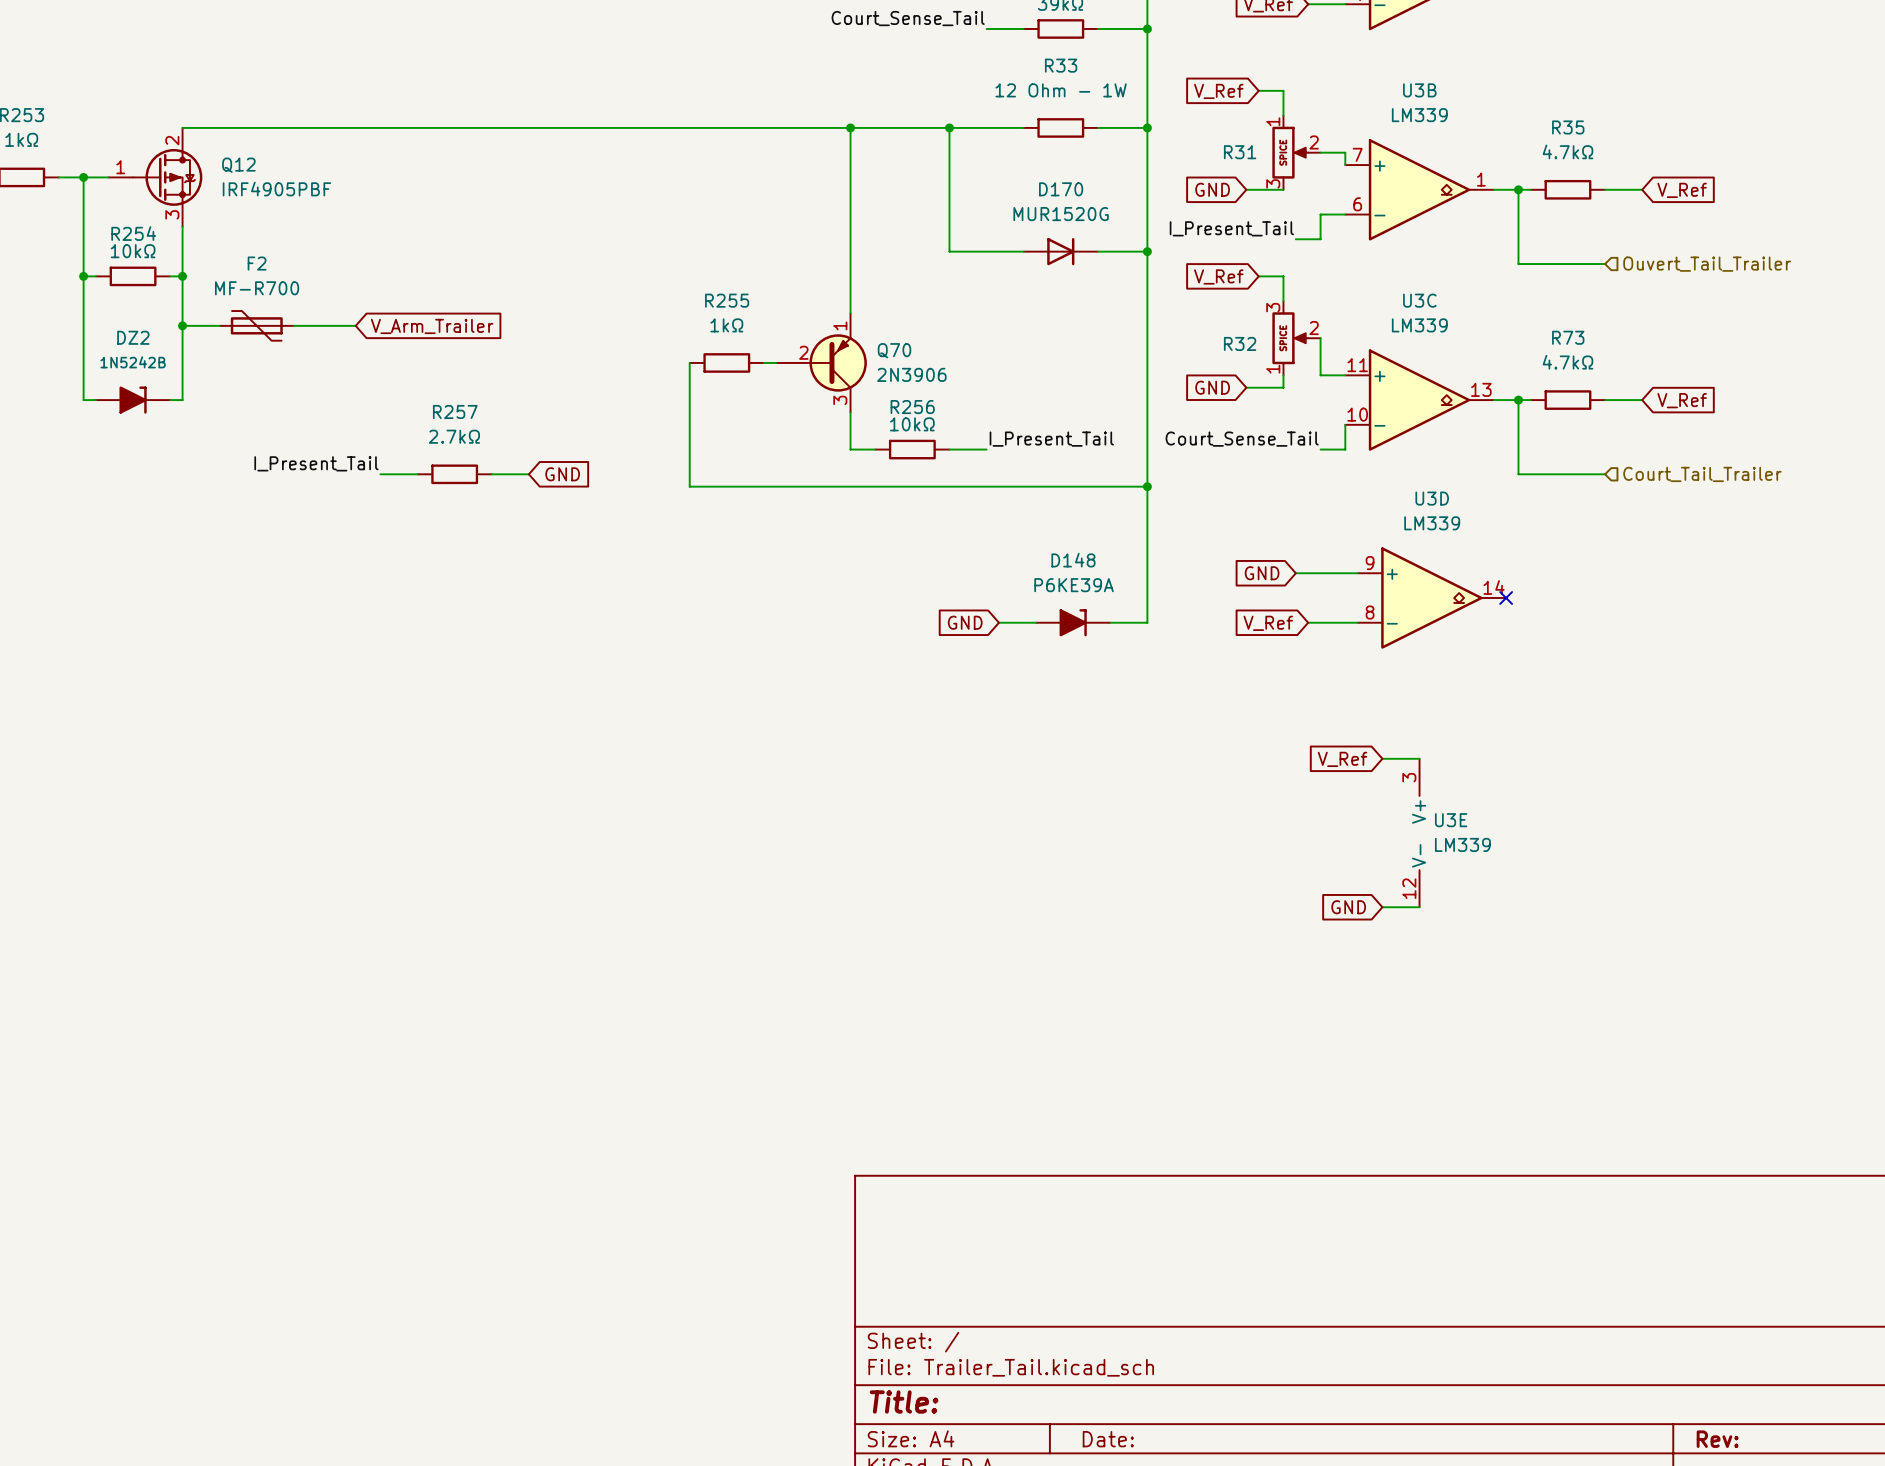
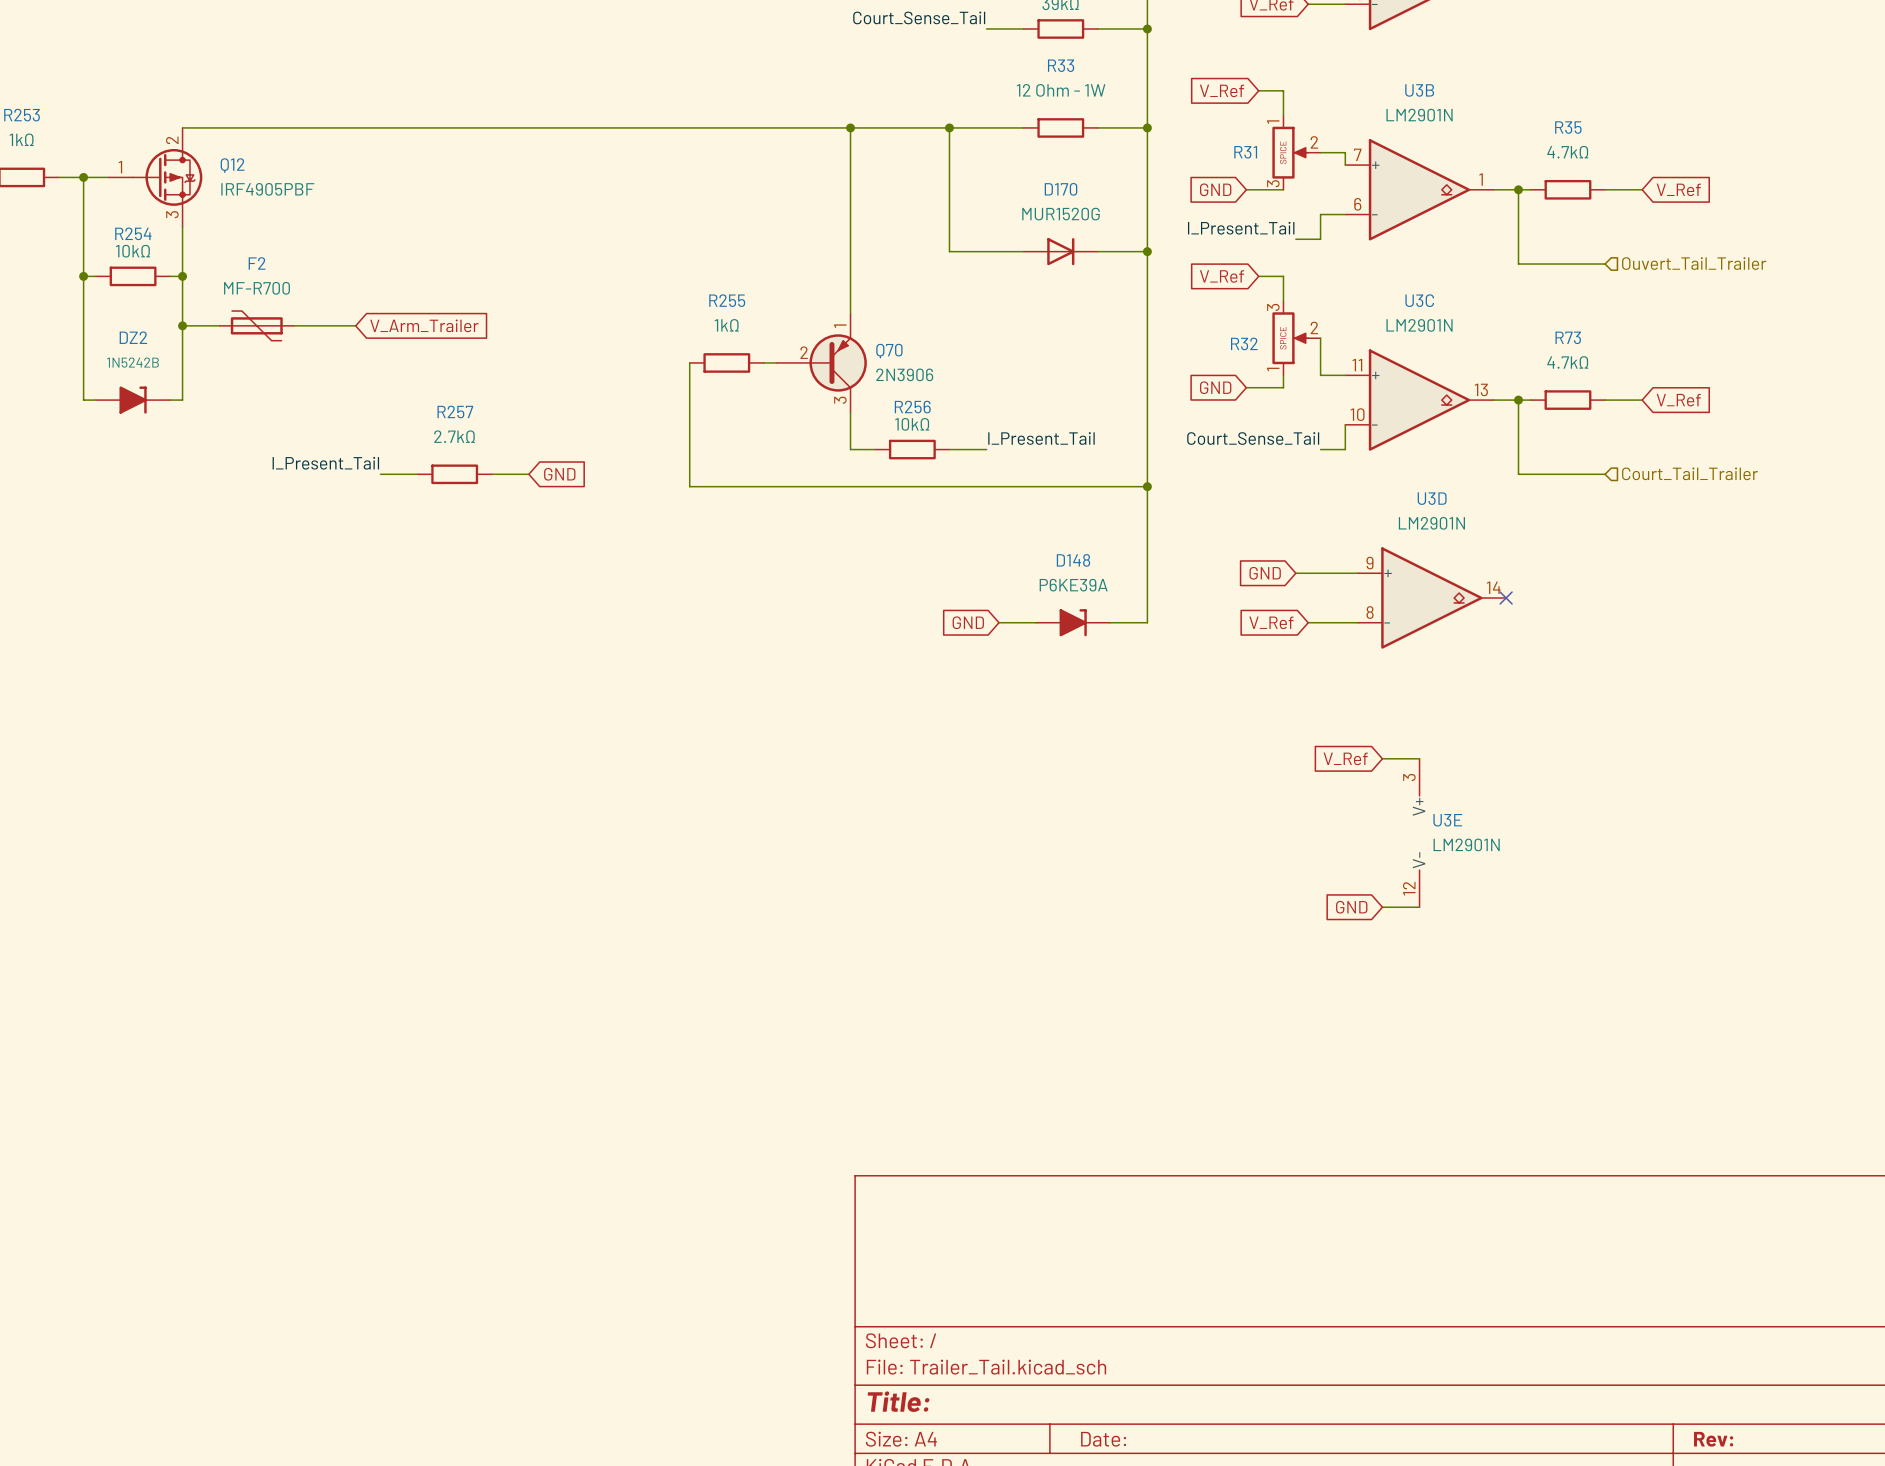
U3B value: LM339 (1419, 115) -> LM2901N (1419, 115)
U3C value: LM339 (1419, 325) -> LM2901N (1419, 325)
U3D value: LM339 (1432, 523) -> LM2901N (1431, 523)
U3E value: LM339 (1462, 844) -> LM2901N (1466, 844)

